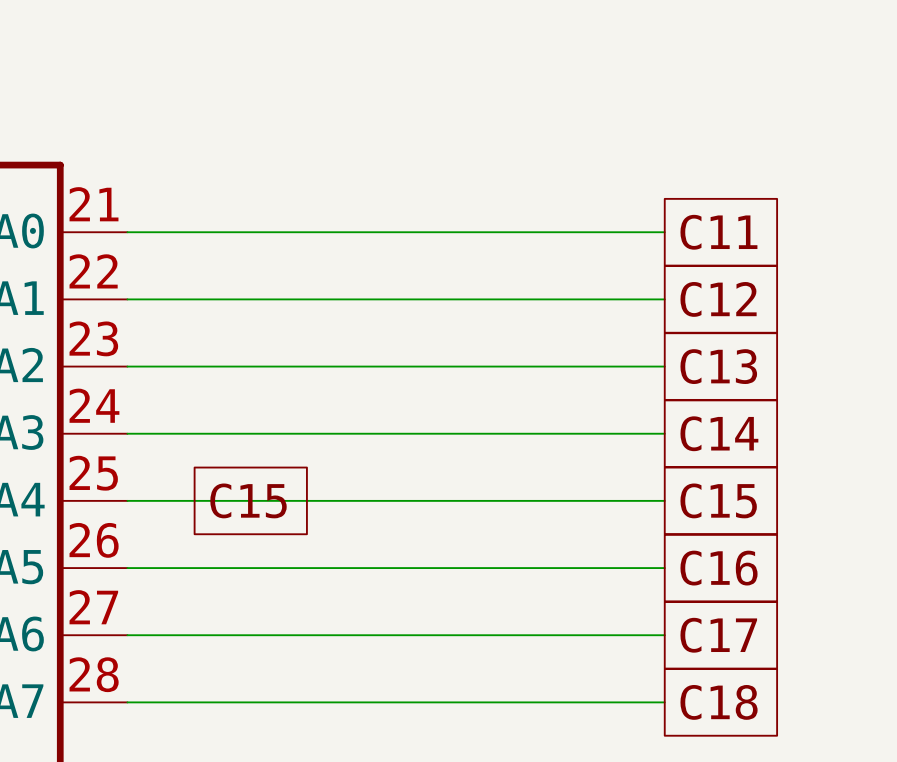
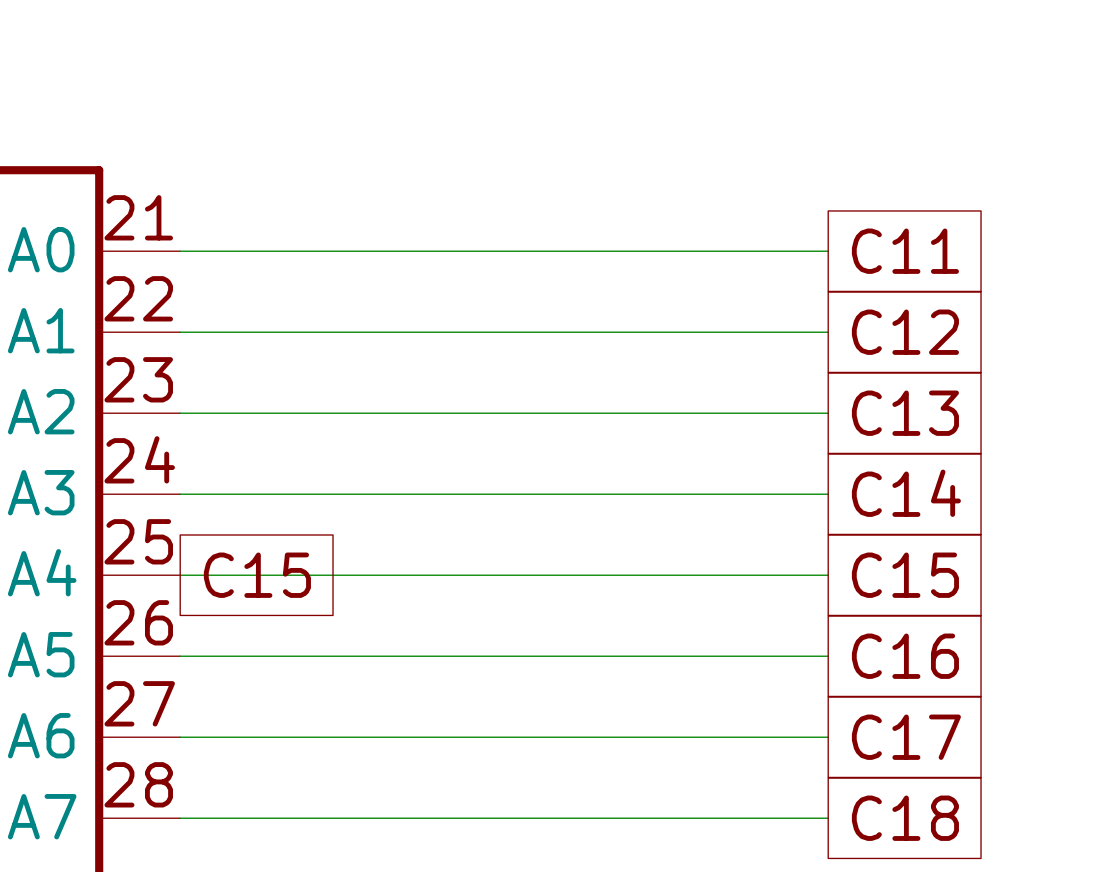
global label position: C15 (248, 500) -> C15 (257, 575)

